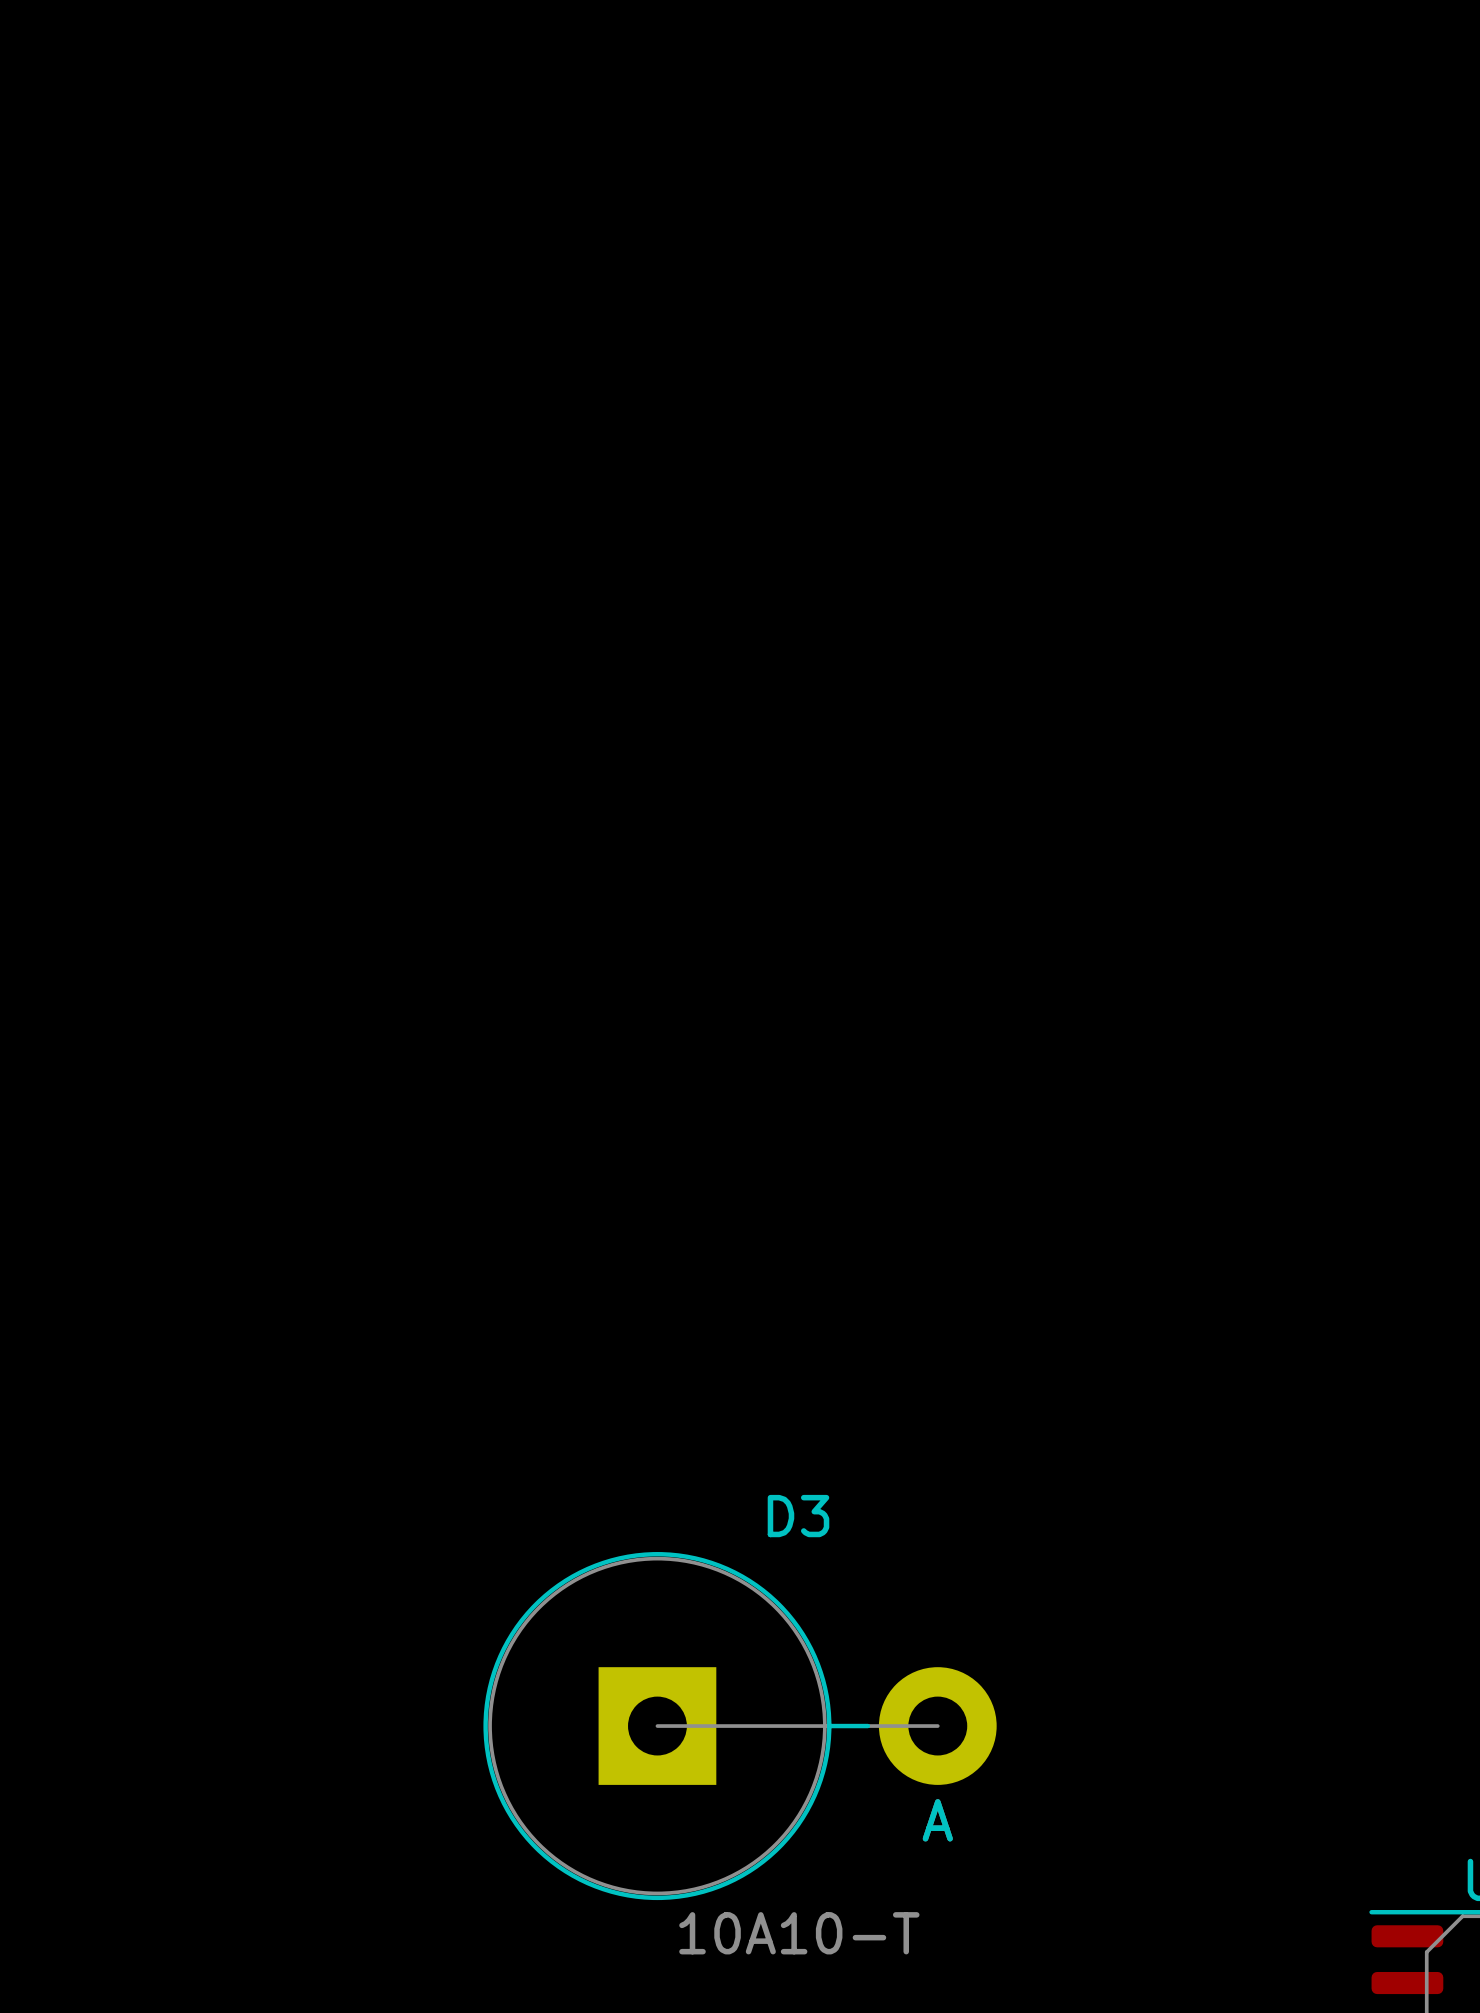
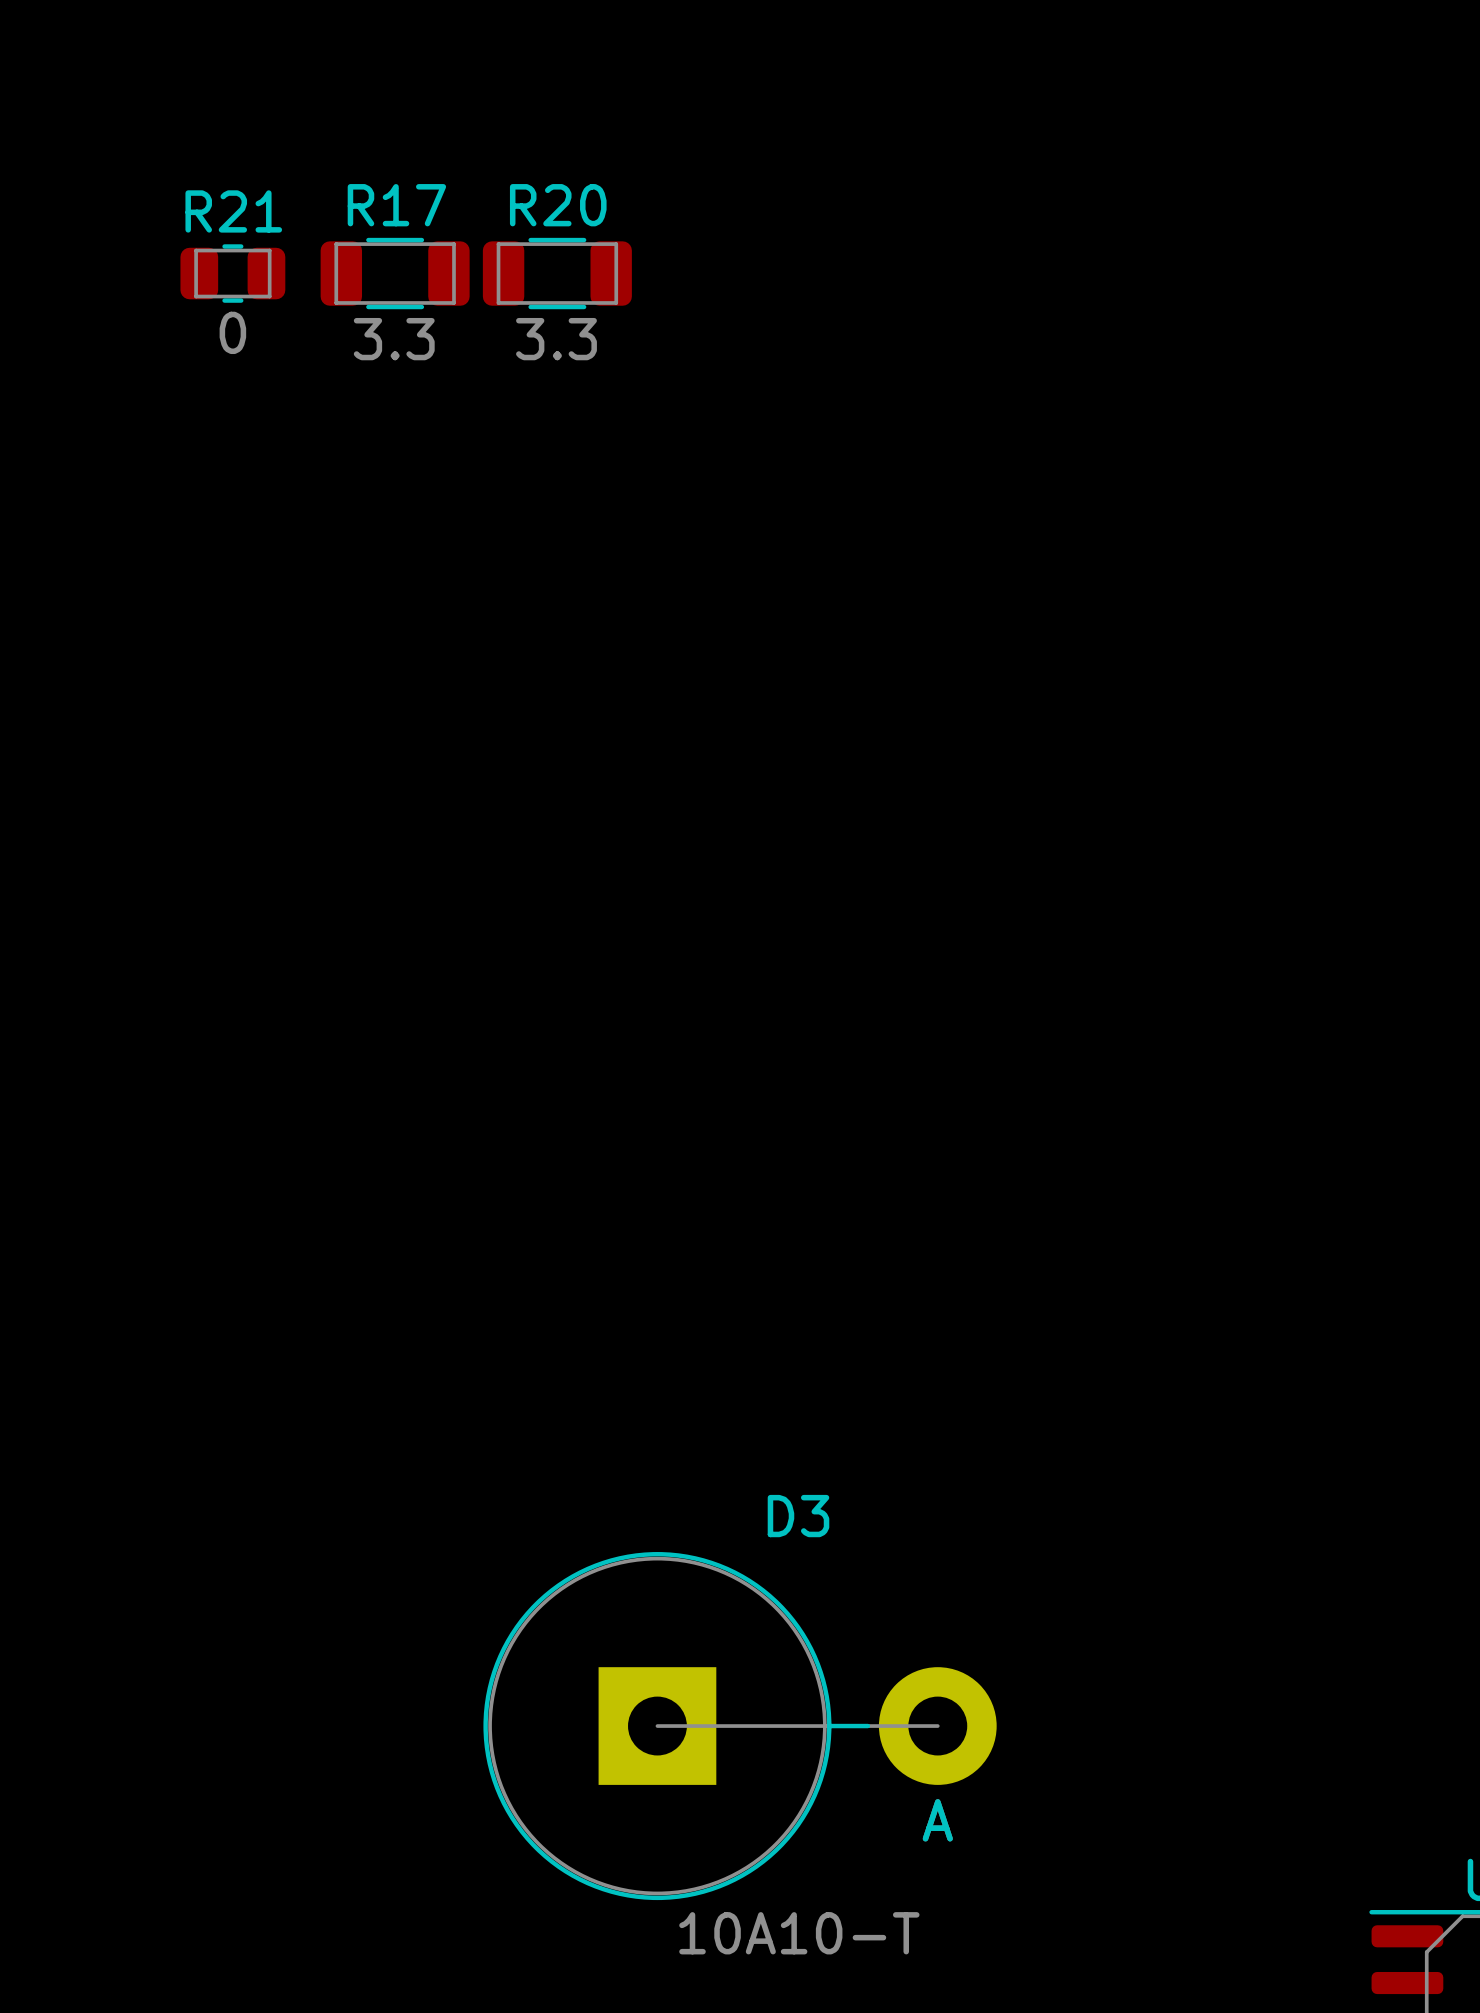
R21: none -> 0 (232, 273)
R17: none -> 3.3 (395, 273)
R20: none -> 3.3 (557, 273)

